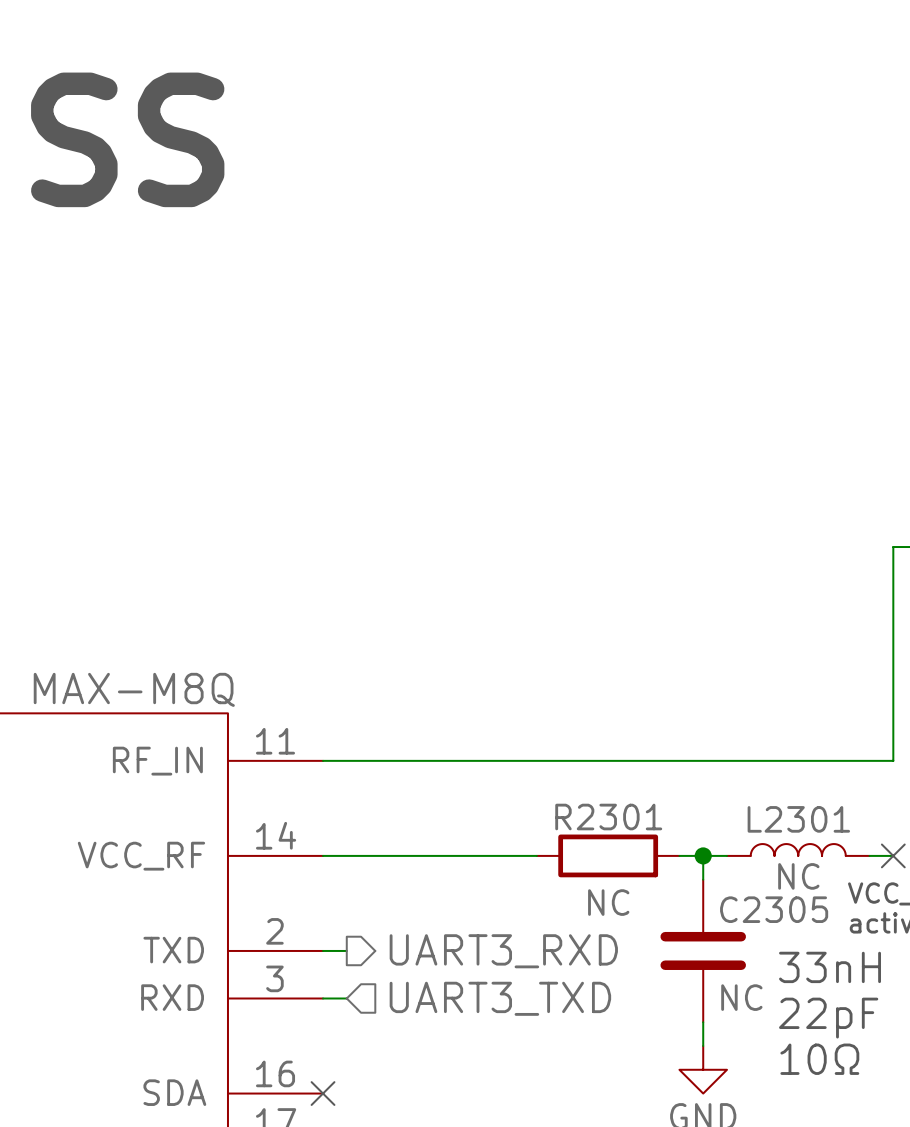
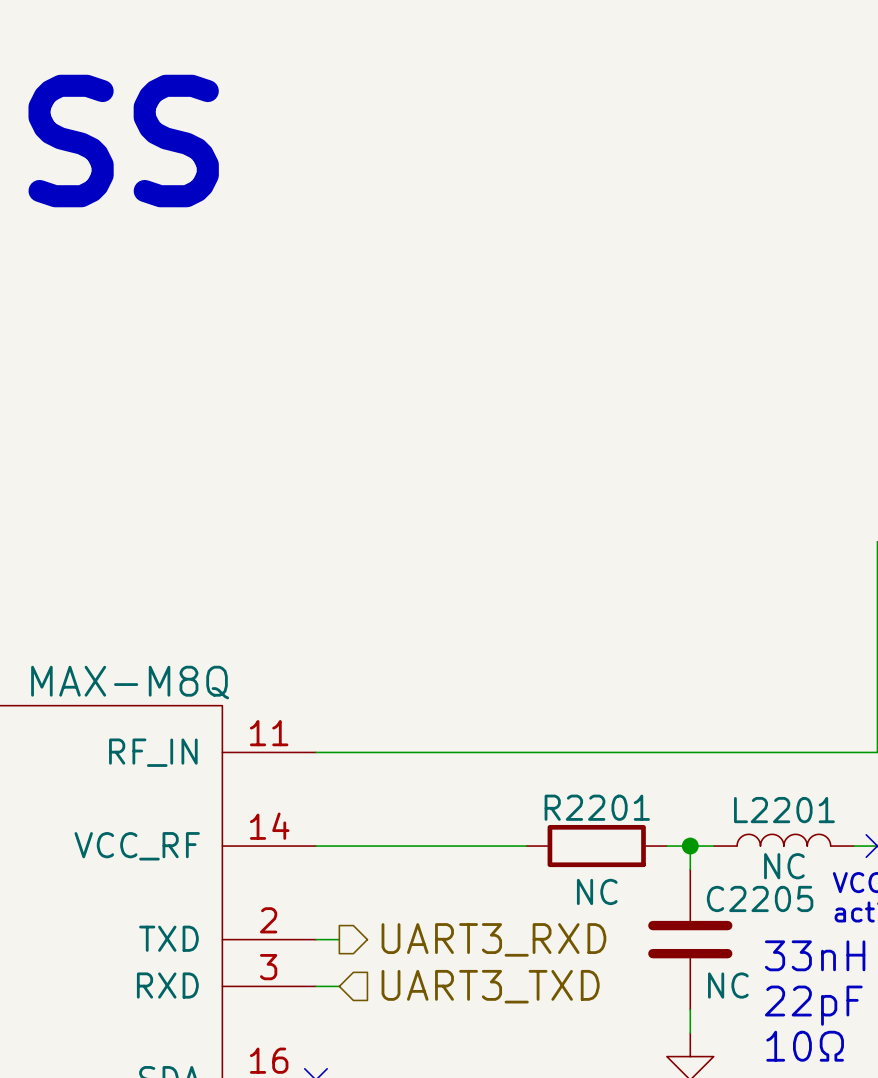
R2301 name: R2301 (608, 817) -> R2201 (597, 807)
L2301 name: L2301 (798, 819) -> L2201 (784, 810)
C2305 name: C2305 (774, 909) -> C2205 (760, 898)

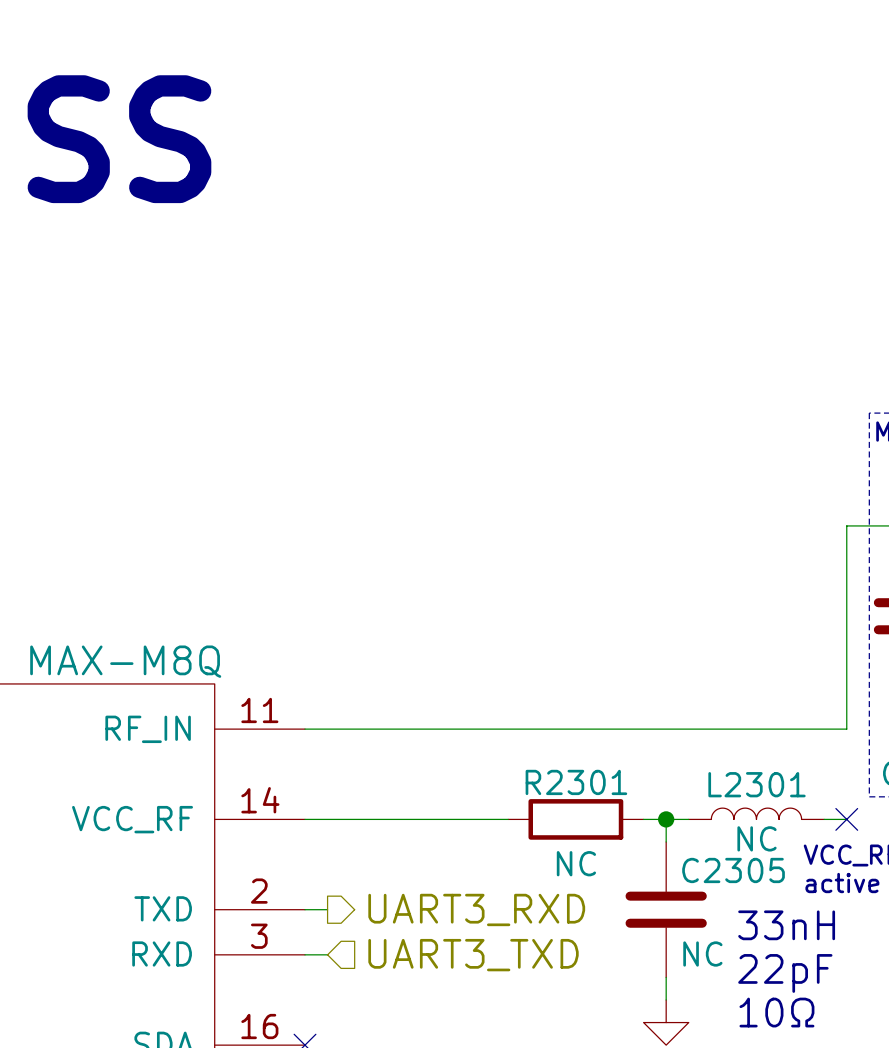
R2201 name: R2201 (597, 807) -> R2301 (576, 782)
L2201 name: L2201 (784, 810) -> L2301 (757, 784)
C2205 name: C2205 (760, 898) -> C2305 (733, 870)

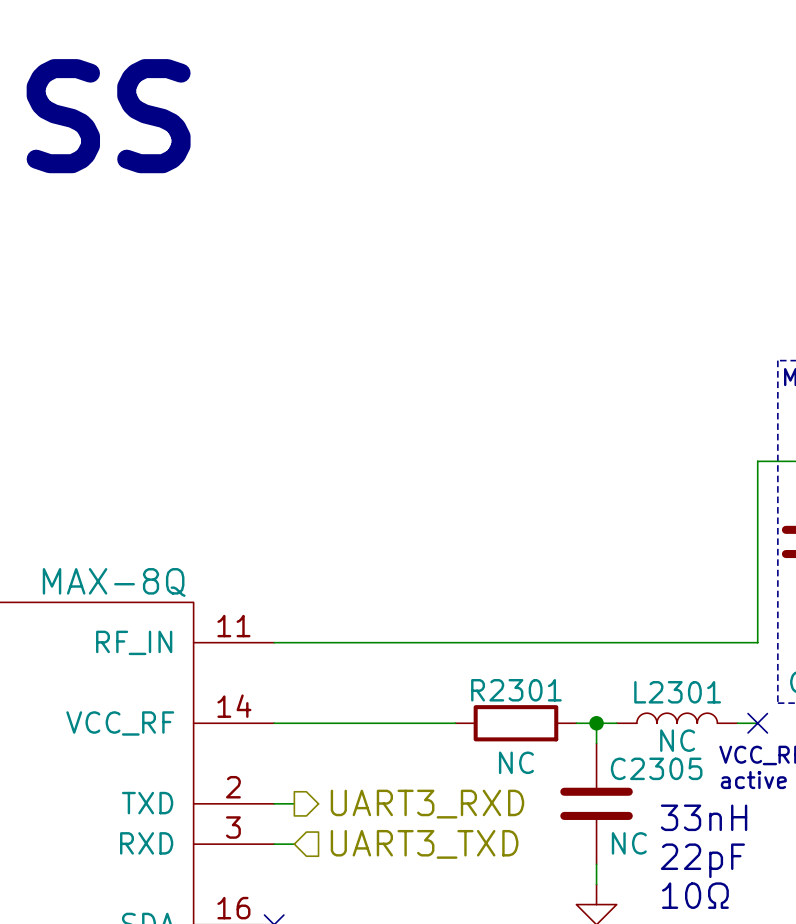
part value: MAX-M8Q (125, 661) -> MAX-8Q (114, 582)

